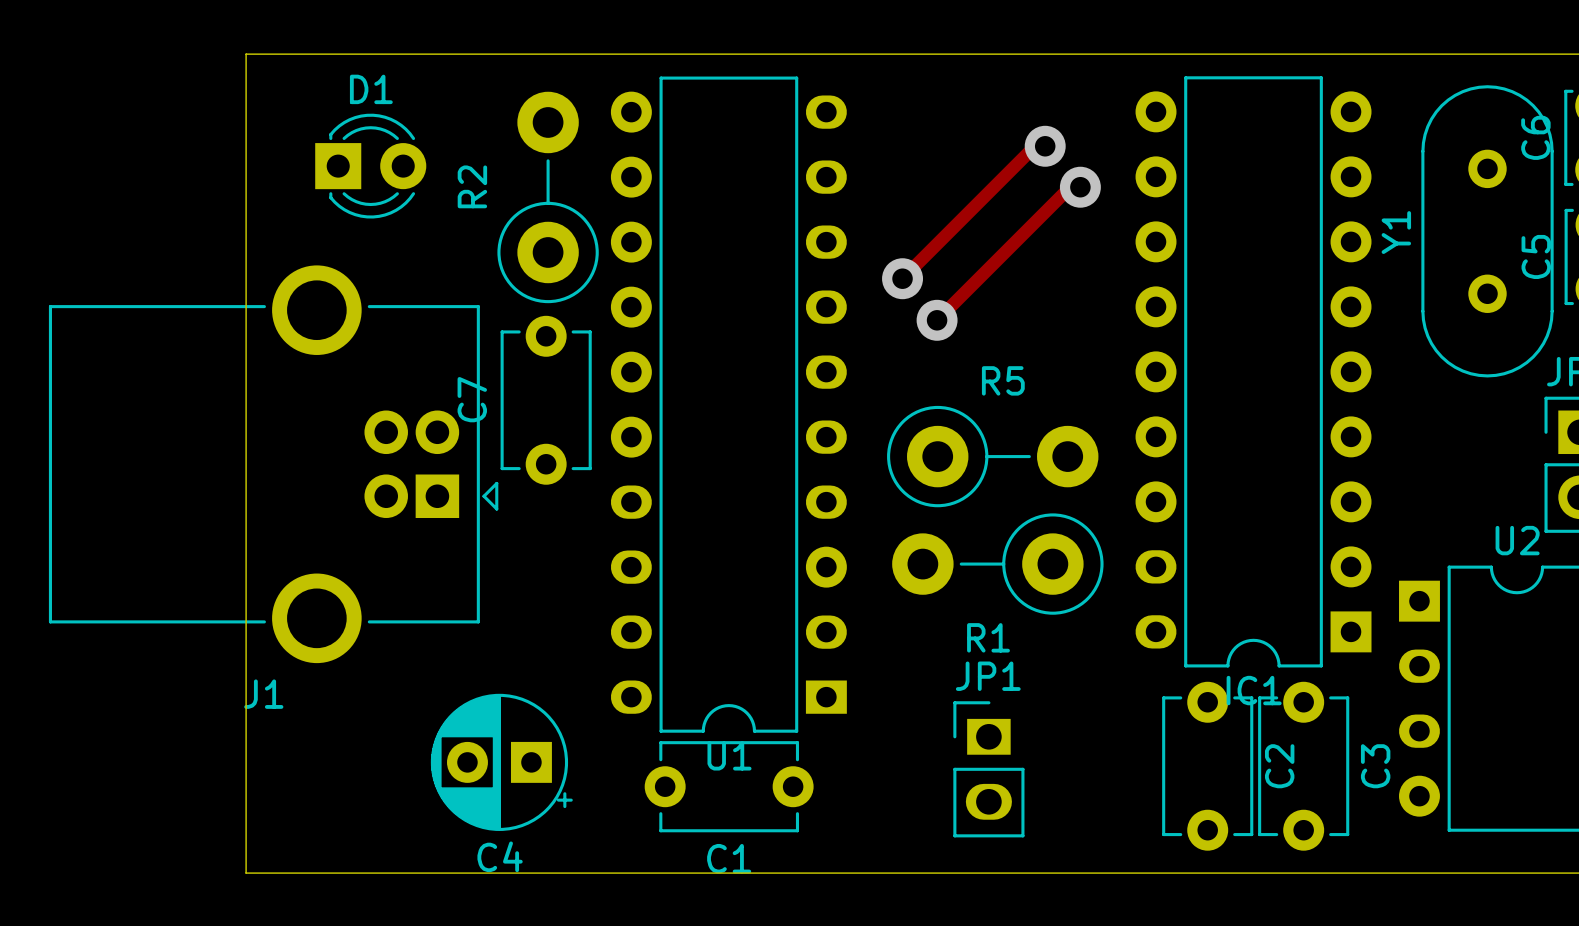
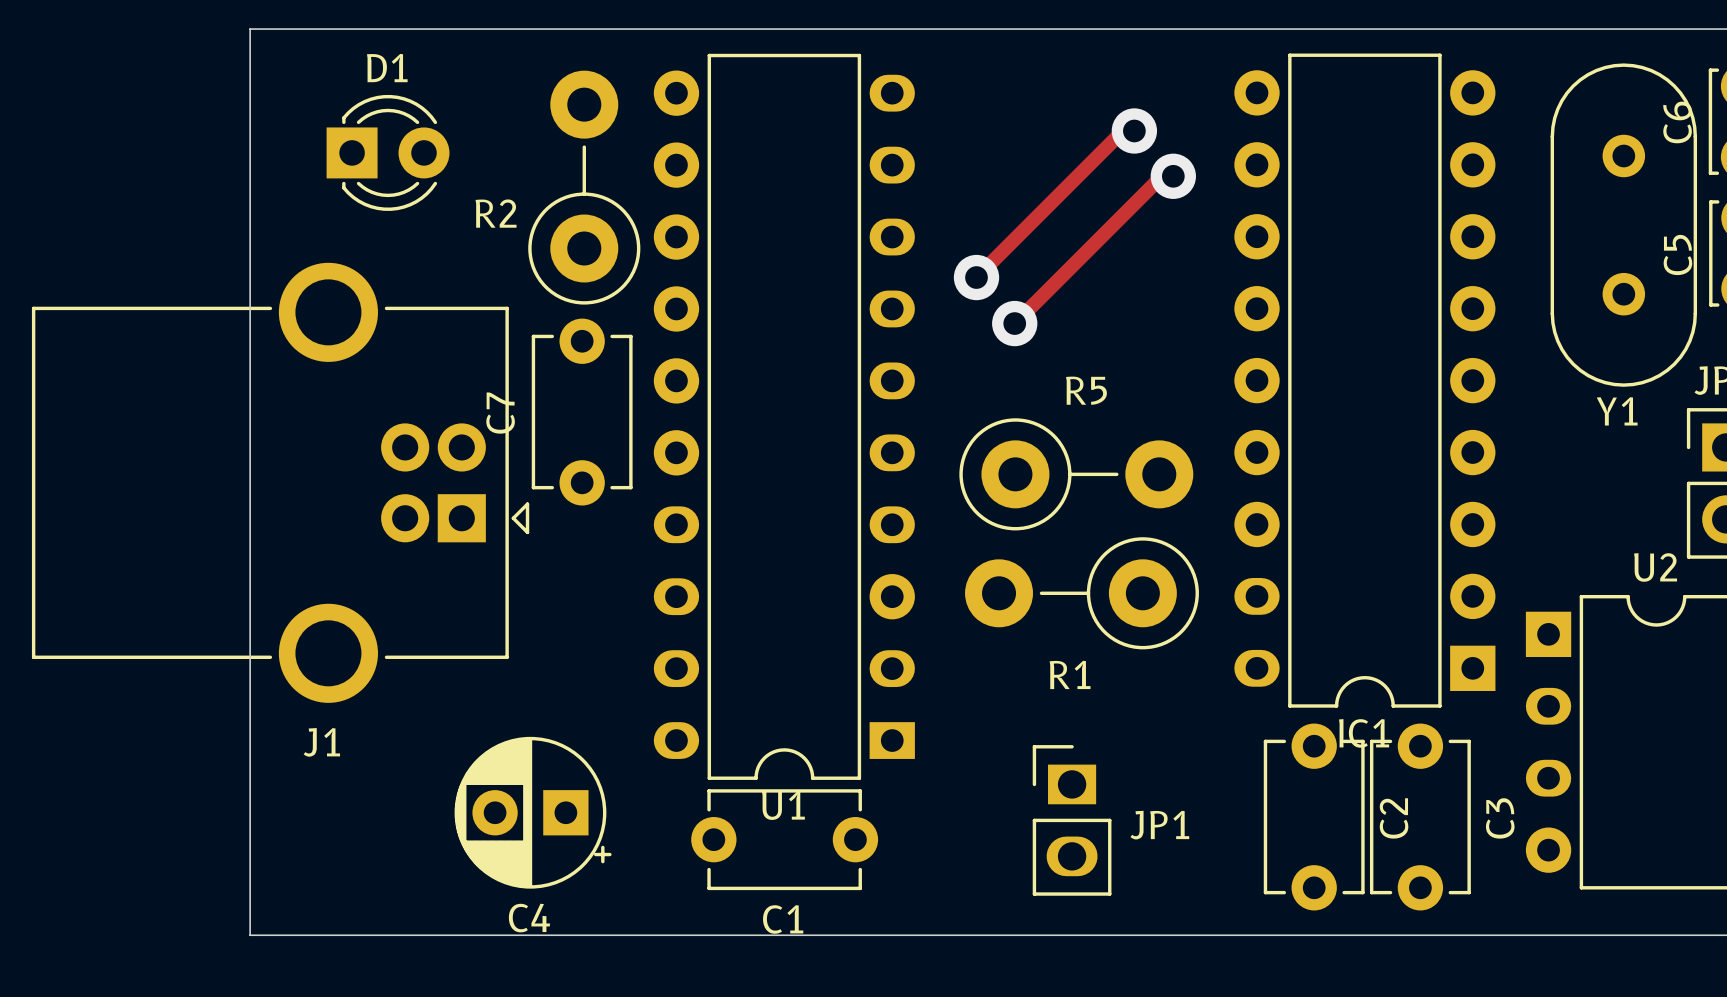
R2 name rotation: 0° (472, 186) -> 90° clockwise (496, 213)
Y1 name rotation: 0° (1396, 232) -> 90° clockwise (1617, 411)
Y1 name position: Y1 (1396, 232) -> Y1 (1617, 411)
JP1 name position: JP1 (988, 676) -> JP1 (1159, 825)
J1 name position: J1 (263, 694) -> J1 (321, 742)

